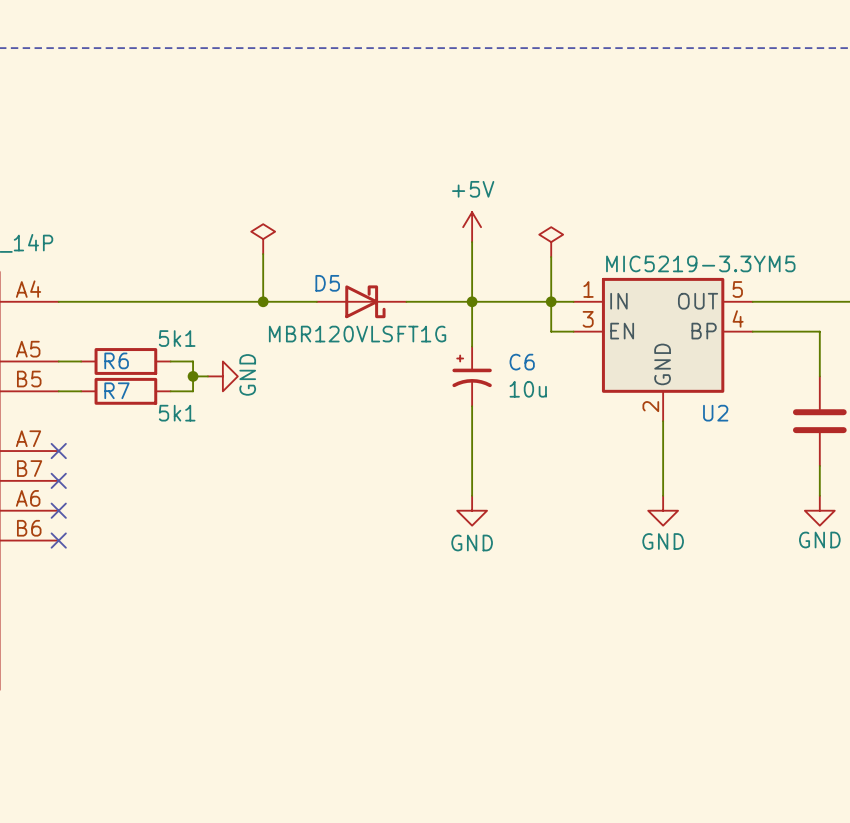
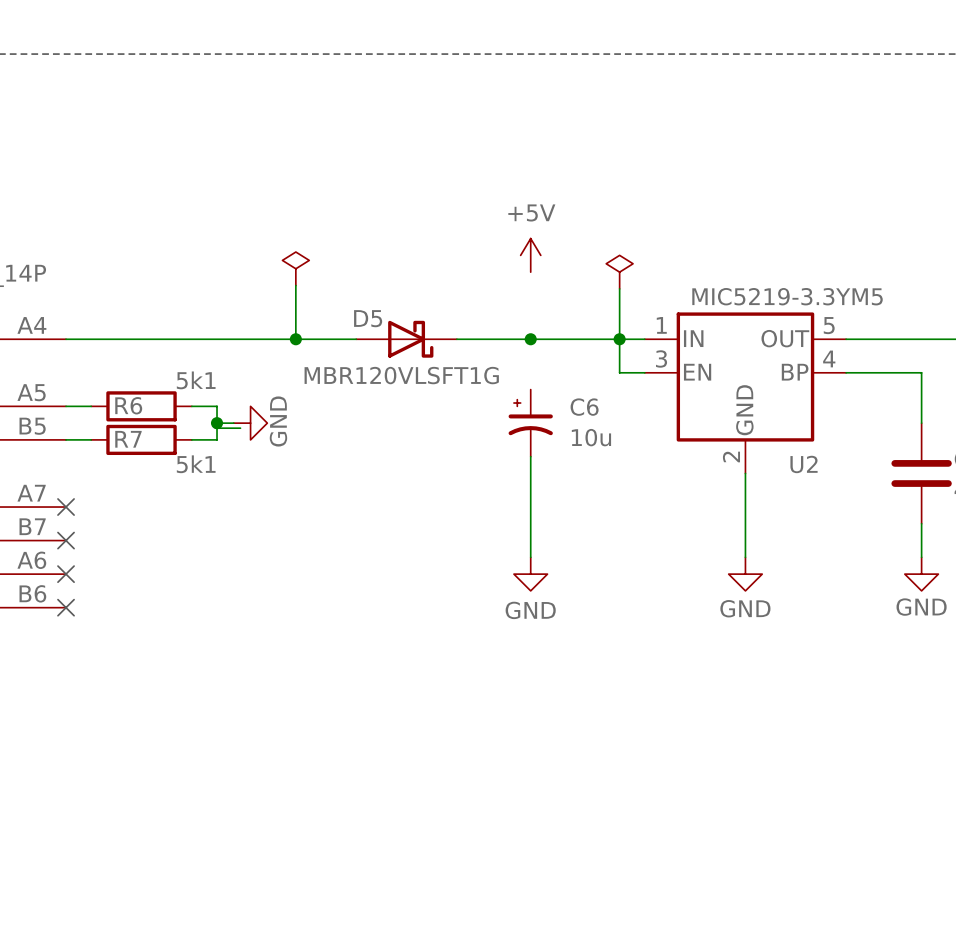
wire: (472, 242) (472, 346) -> none
wire: none -> (215, 428) (240, 428)

